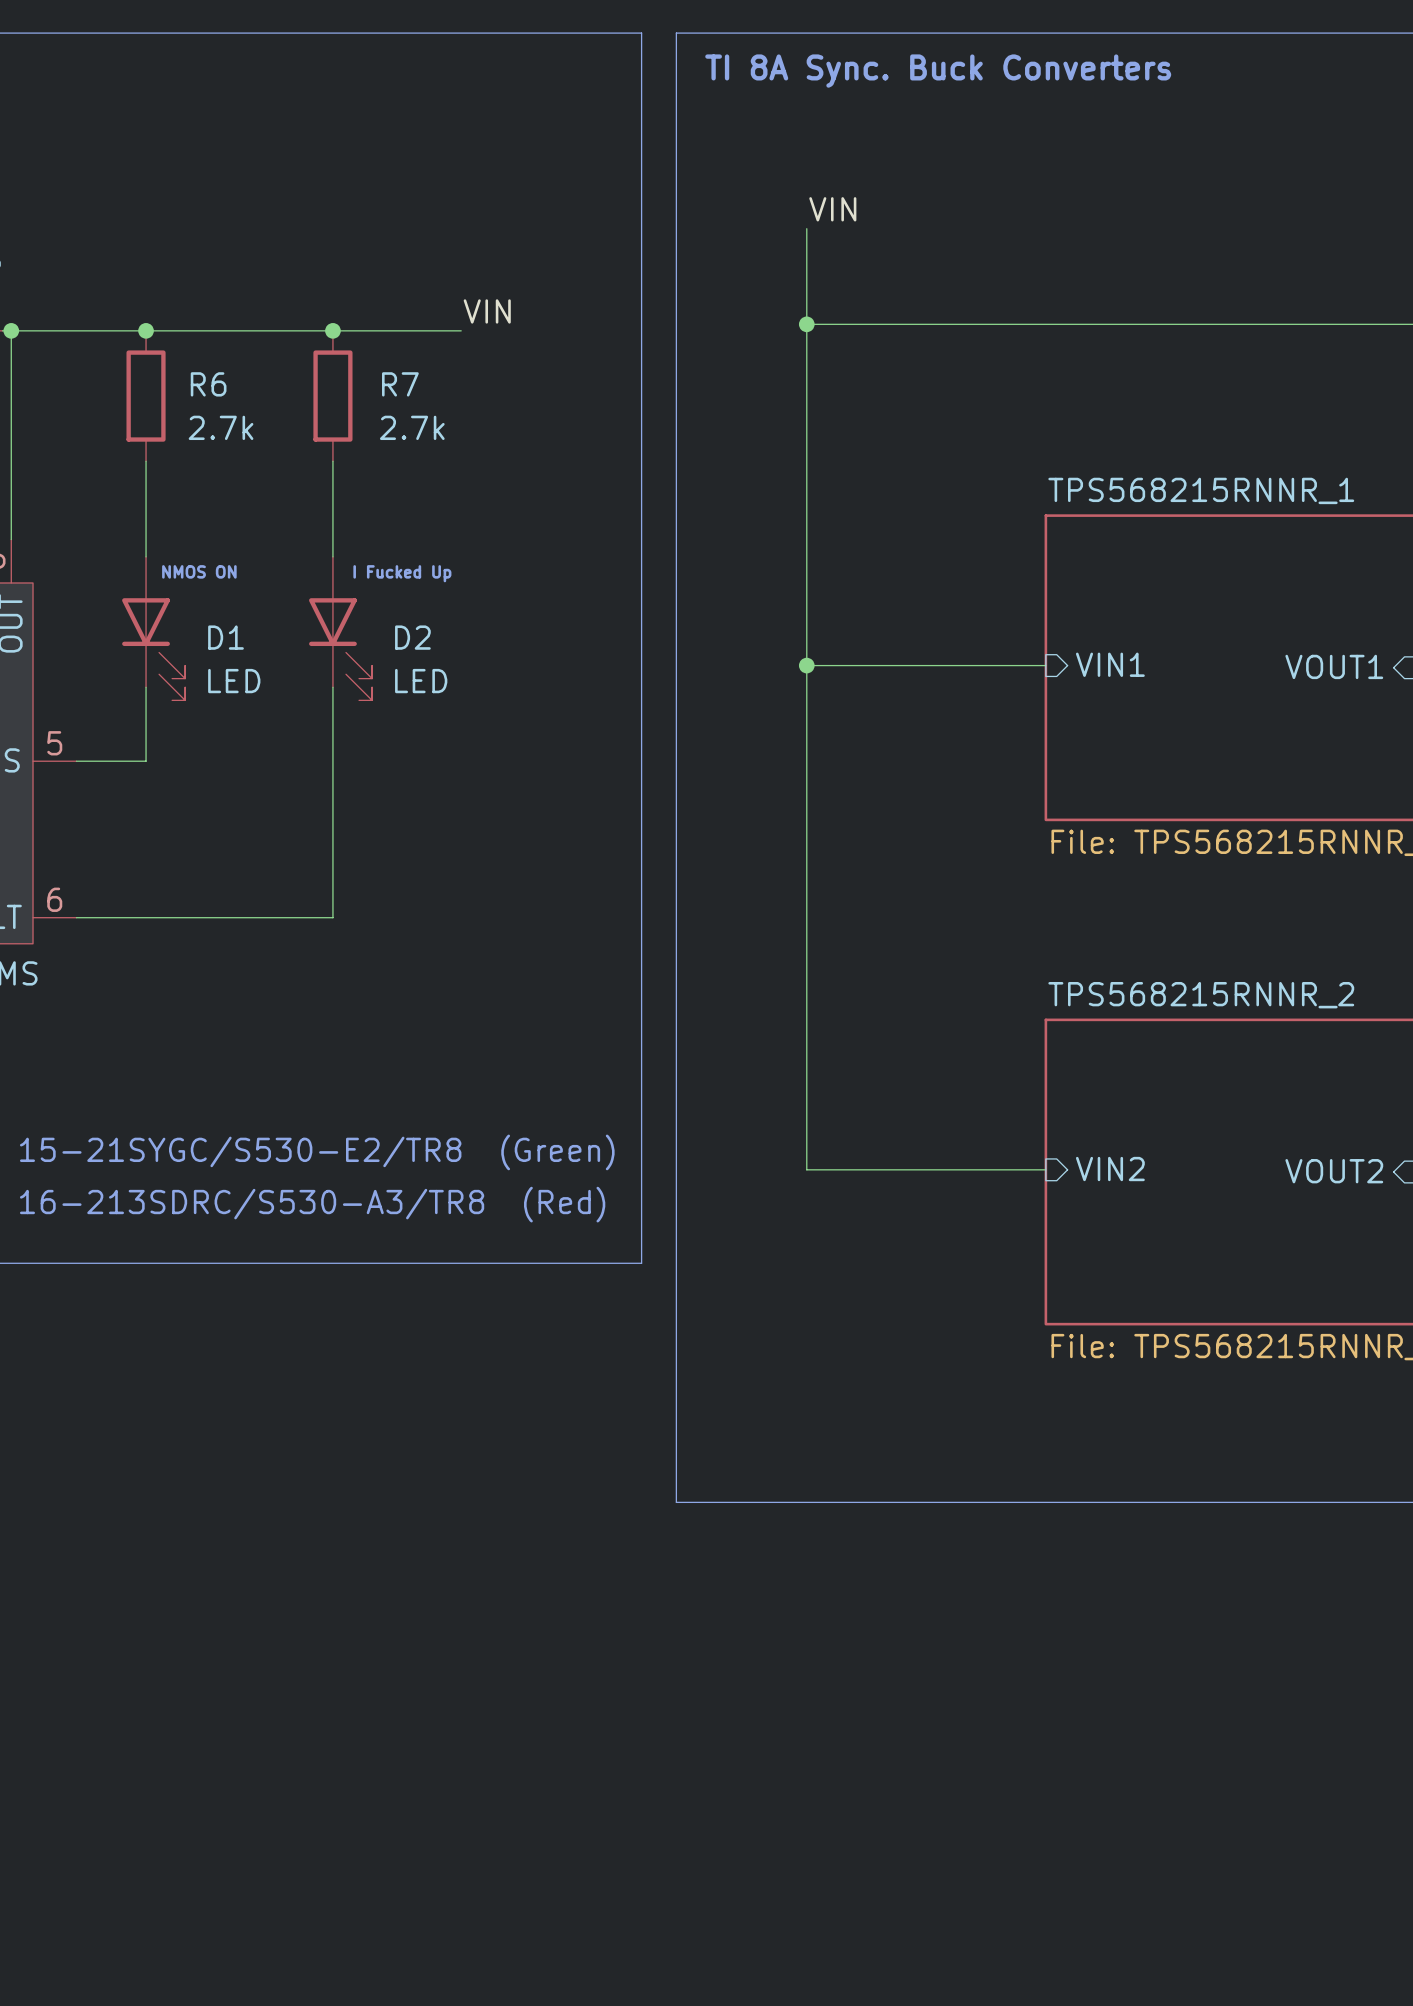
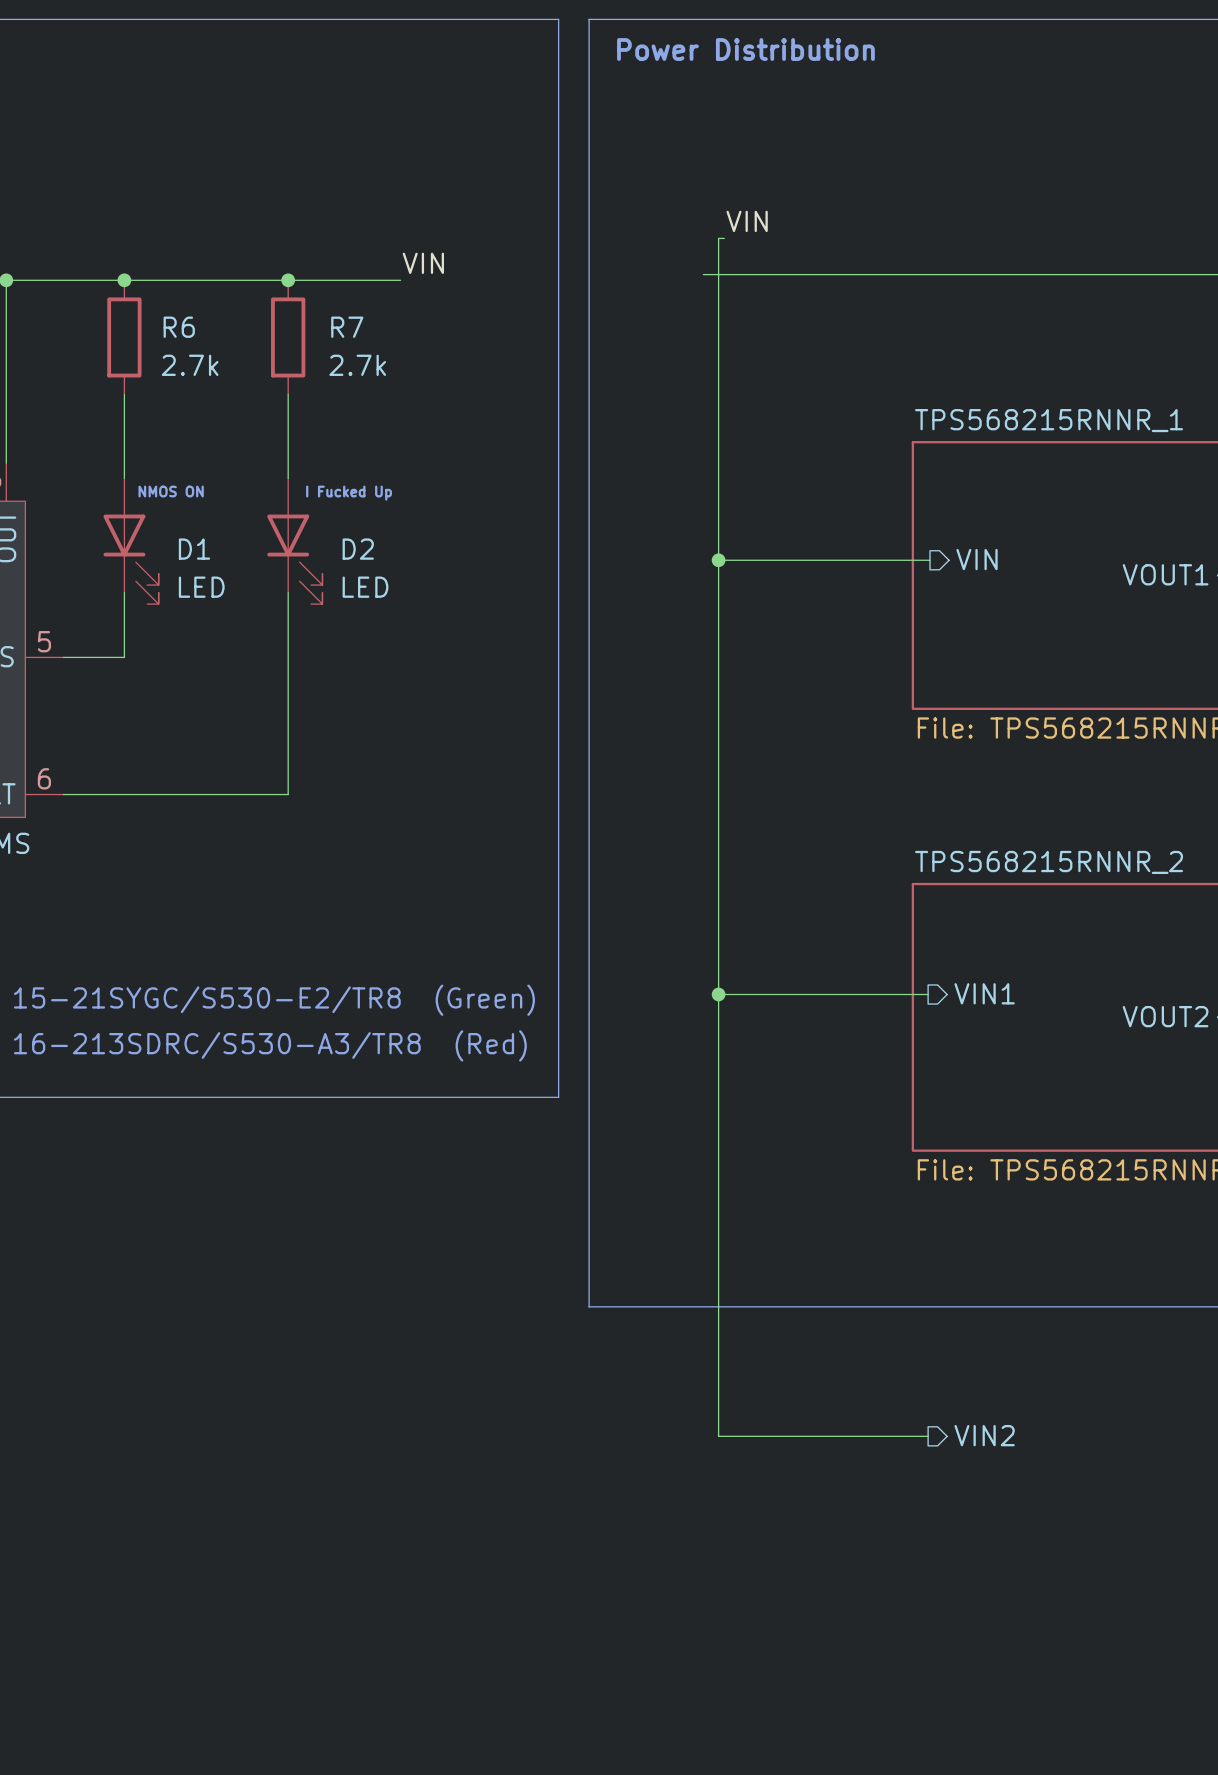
text: TI 8A Sync. Buck Converters (938, 71) -> Power Distribution (745, 49)
label position: VIN (832, 209) -> VIN (747, 221)
wire: (806, 228) (806, 1169) (1045, 1169) -> none
wire: none -> (724, 238) (718, 238) (718, 1436) (928, 1436)
junction: (806, 324) -> none
wire: none -> (718, 560) (930, 560)
sheet pin: VIN1 (1110, 664) -> VIN (977, 559)
wire: (806, 665) (1045, 665) -> none
junction position: (806, 665) -> (718, 560)
wire: none -> (718, 994) (928, 994)
junction: none -> (718, 994)
sheet pin: VIN2 (1110, 1169) -> VIN1 (984, 993)
sheet pin: none -> VIN2 (984, 1435)

